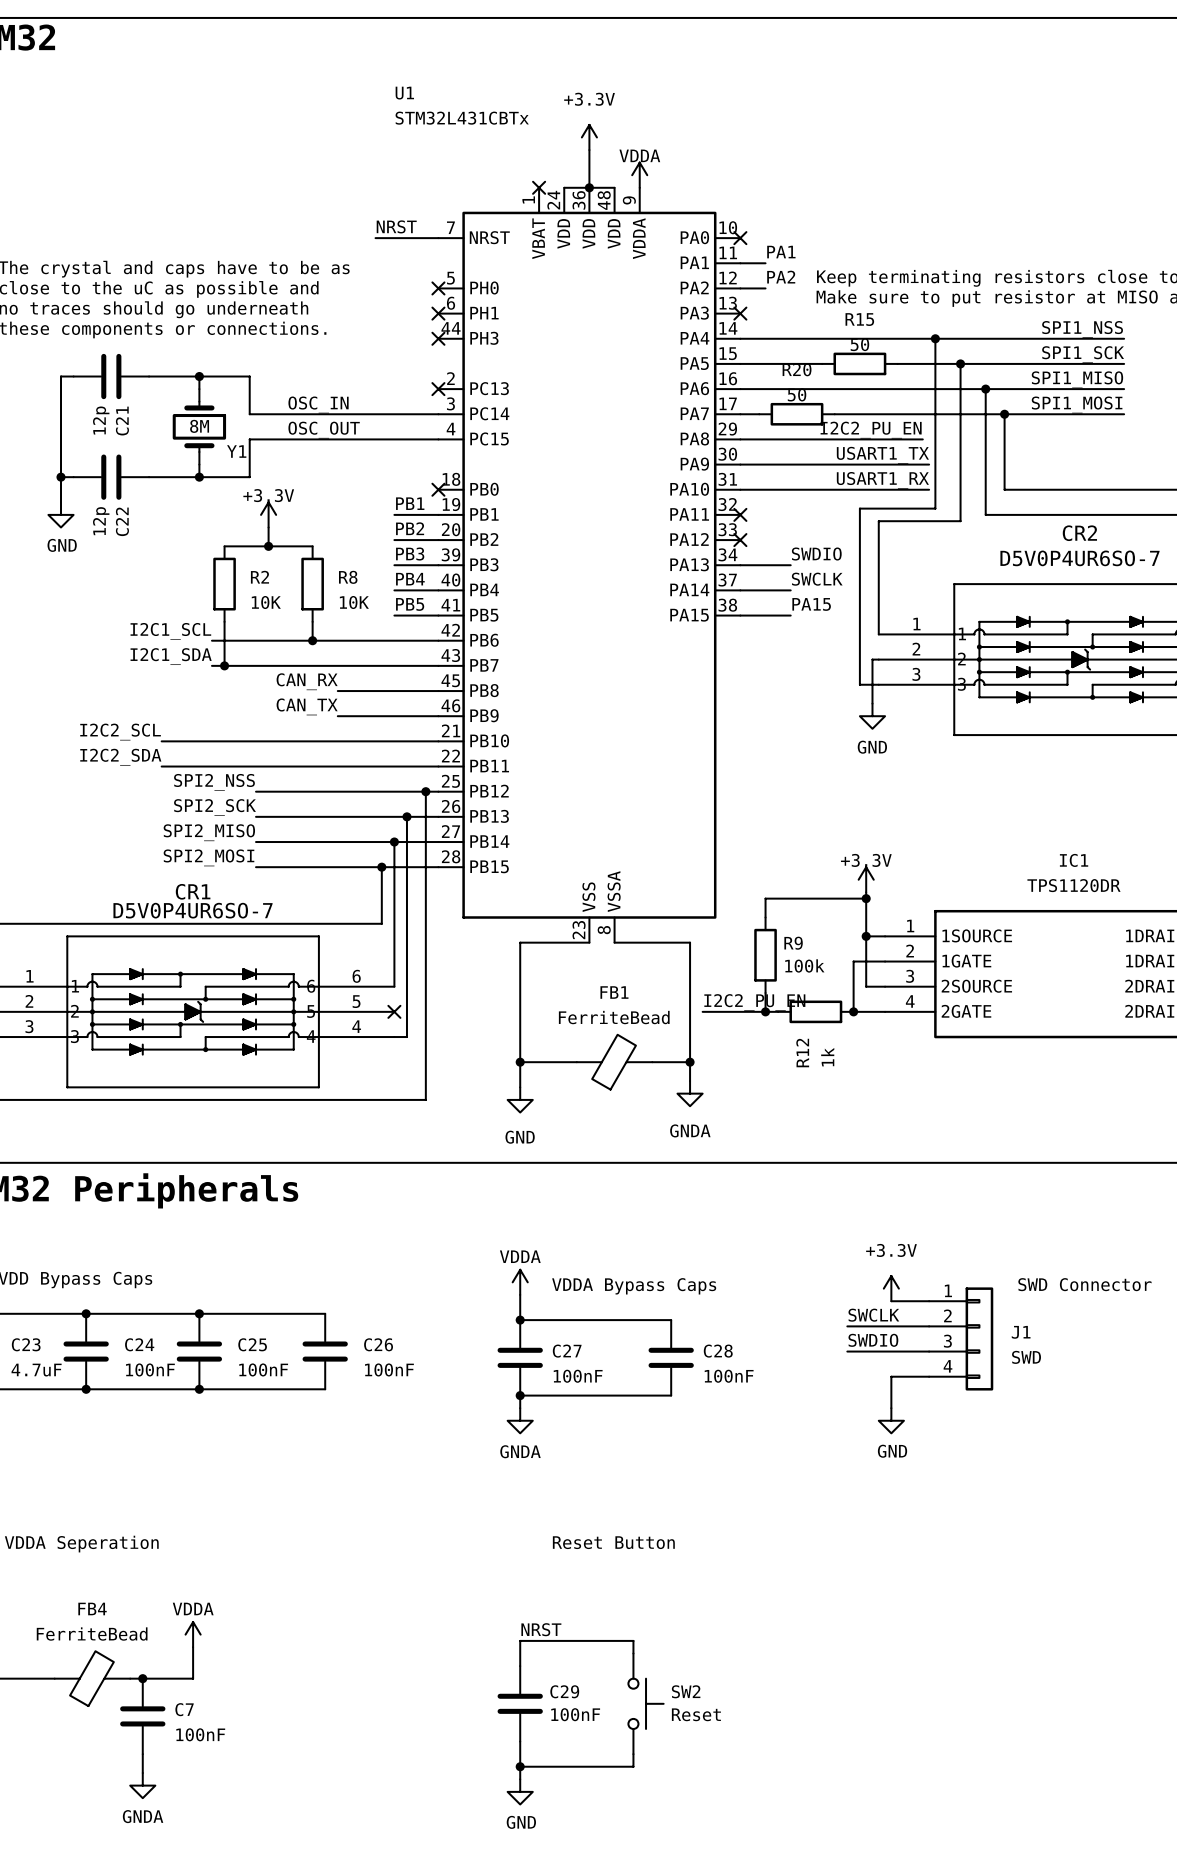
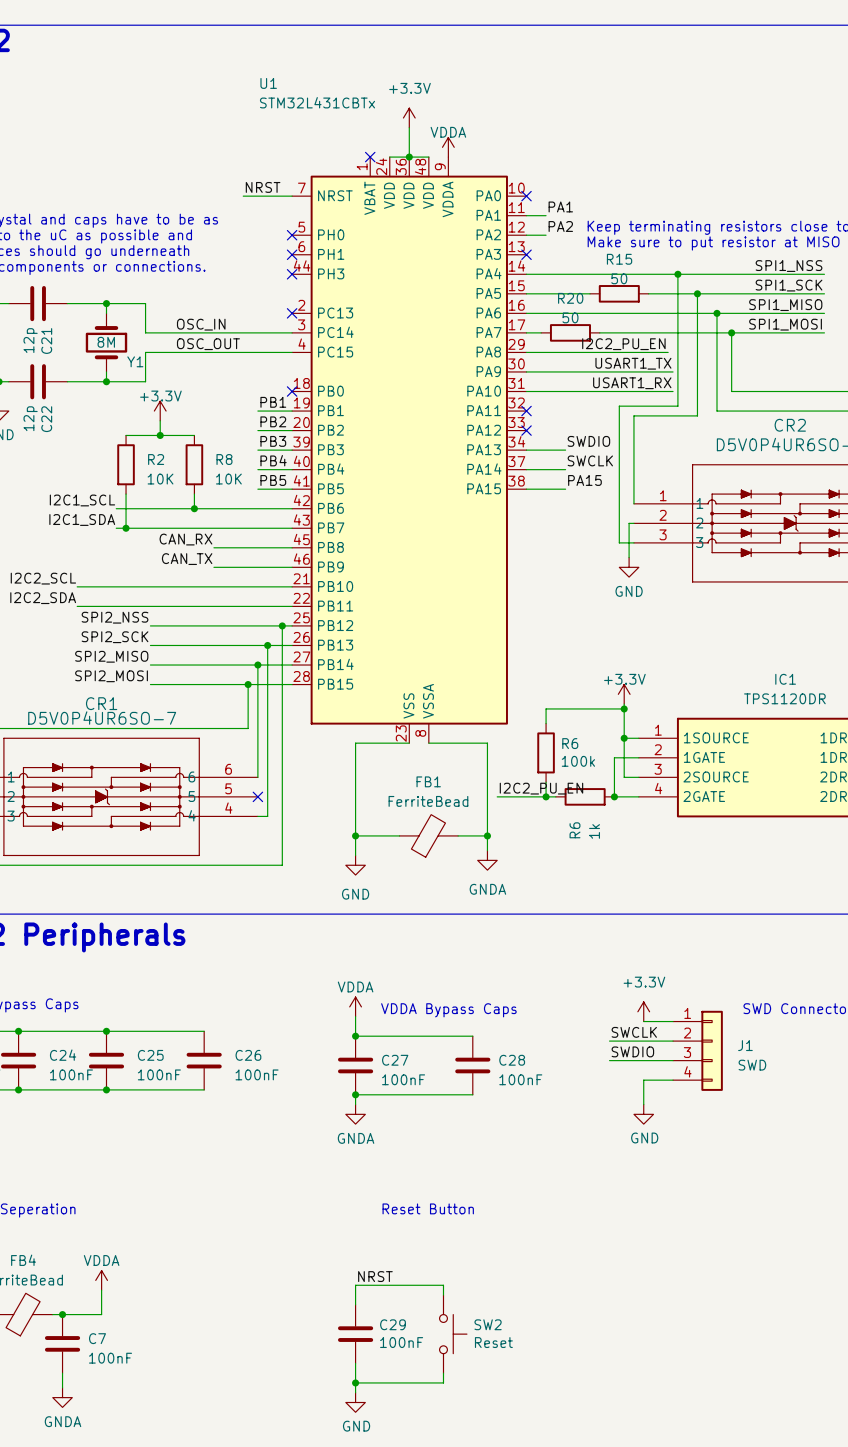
R9 name: R9 (793, 943) -> R6 (570, 743)
R12 name: R12 (802, 1053) -> R6 (574, 830)

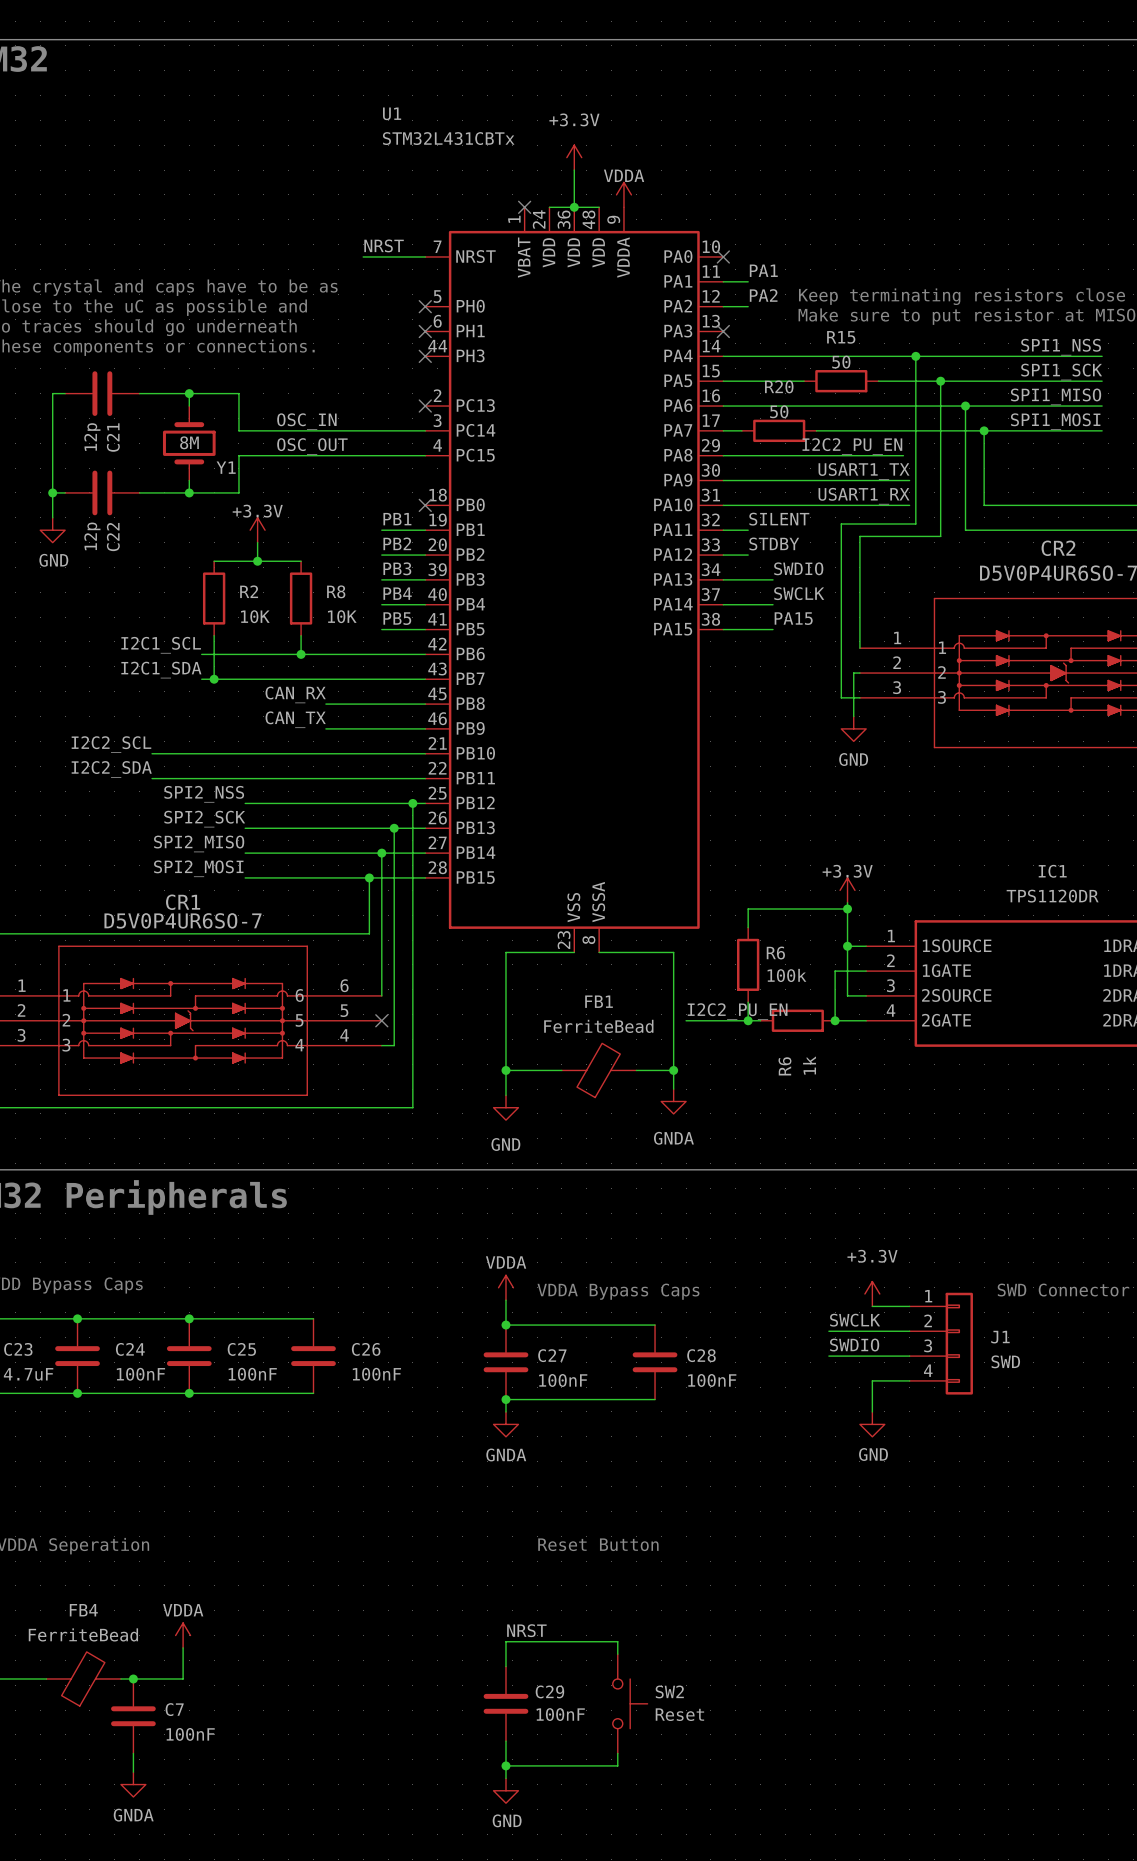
label: none -> SILENT (779, 519)
wire: none -> (723, 530) (748, 530)
no-connect mark: (526, 411) -> none
label: none -> STDBY (774, 543)
wire: none -> (723, 555) (748, 555)
no-connect mark: (526, 430) -> none

